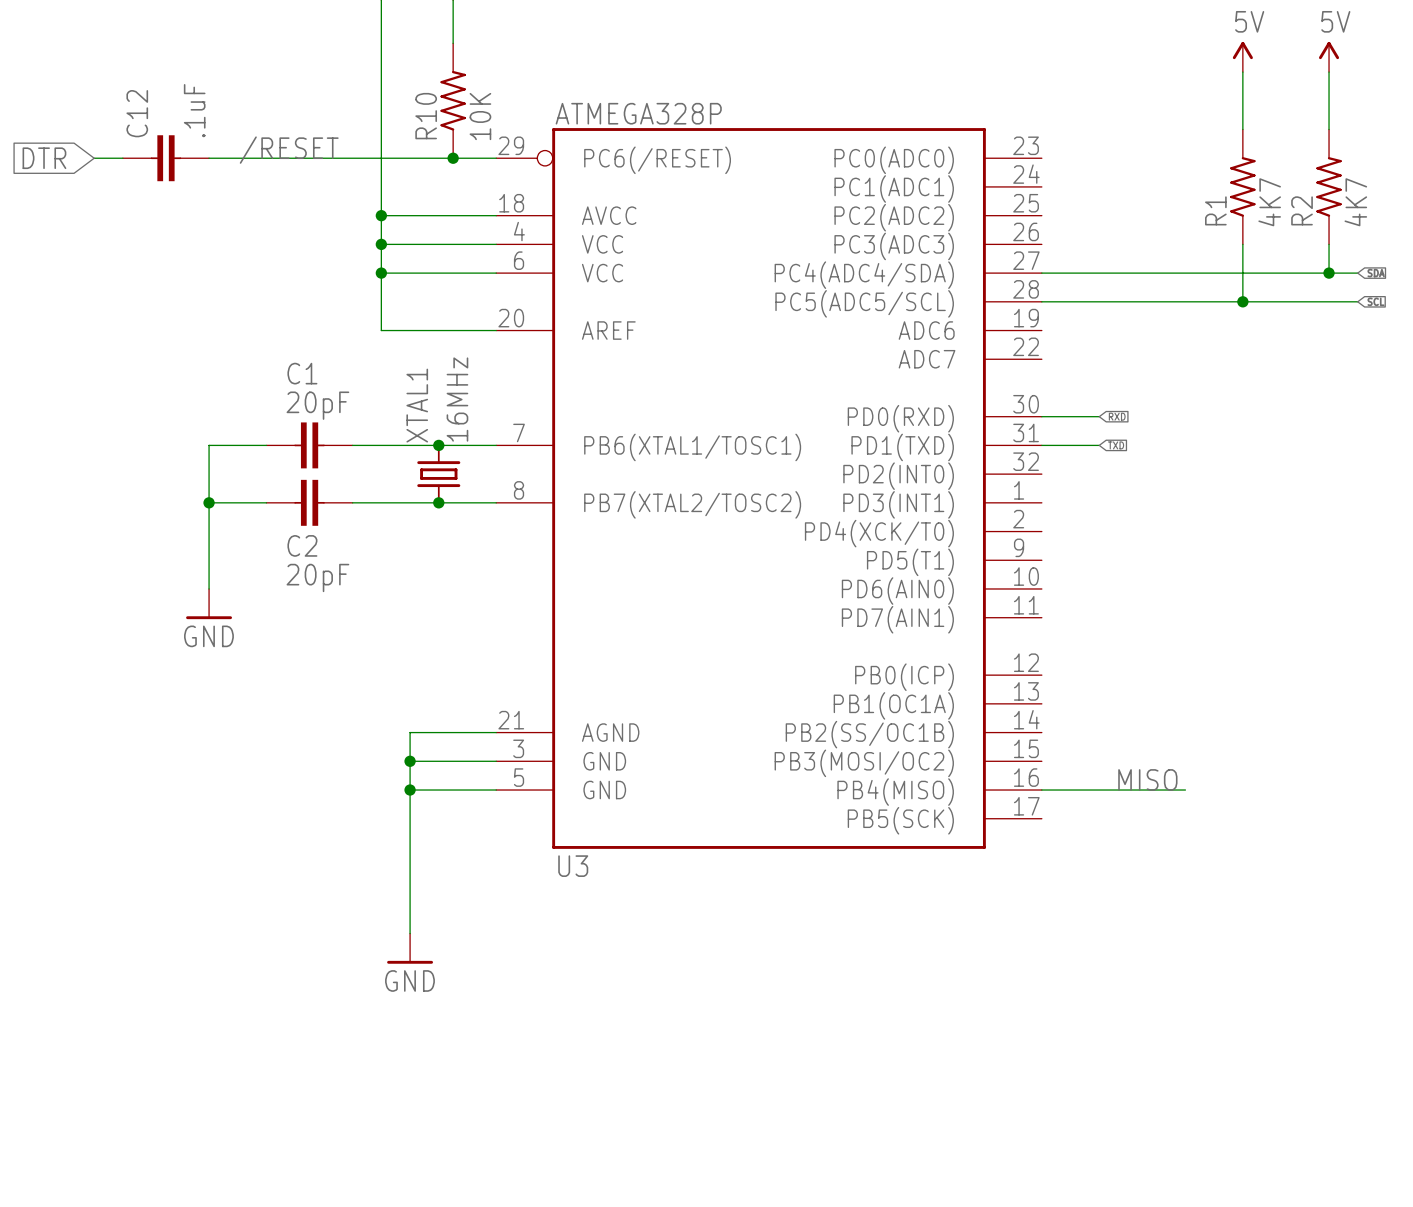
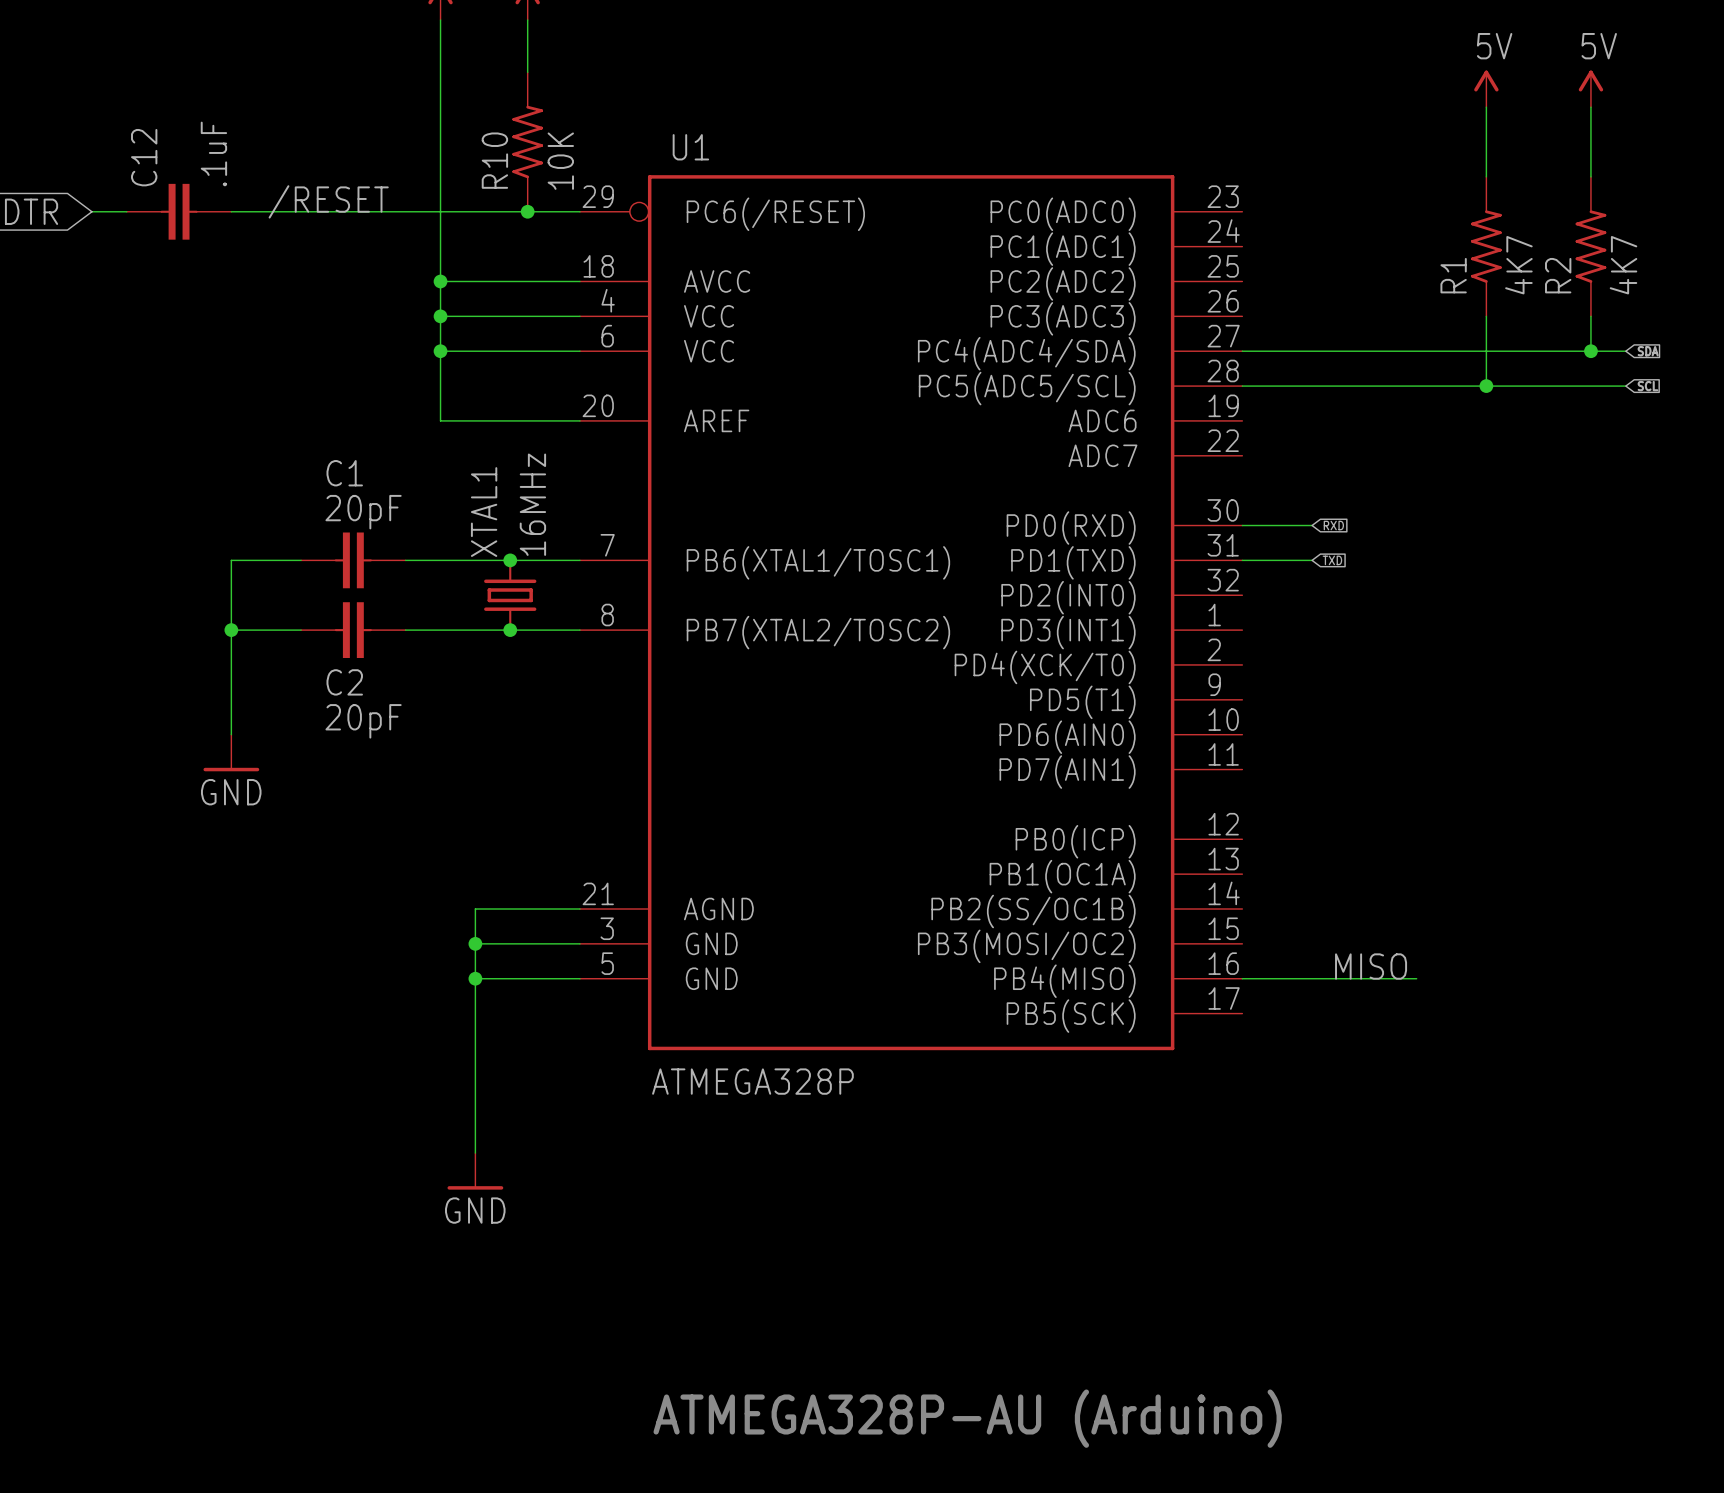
U3 value position: ATMEGA328P (638, 113) -> ATMEGA328P (752, 1081)
U3 name: U3 (573, 866) -> U1 (690, 147)
text: none -> ATMEGA328P-AU (Arduino) (967, 1418)

